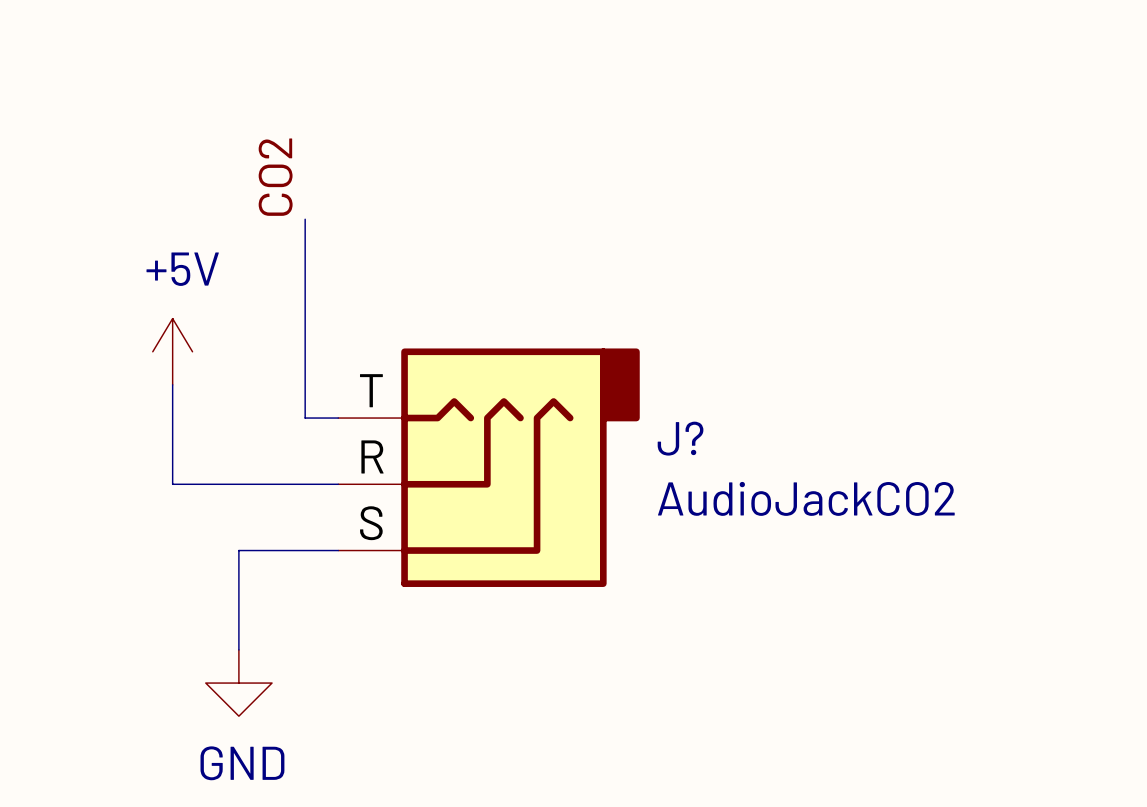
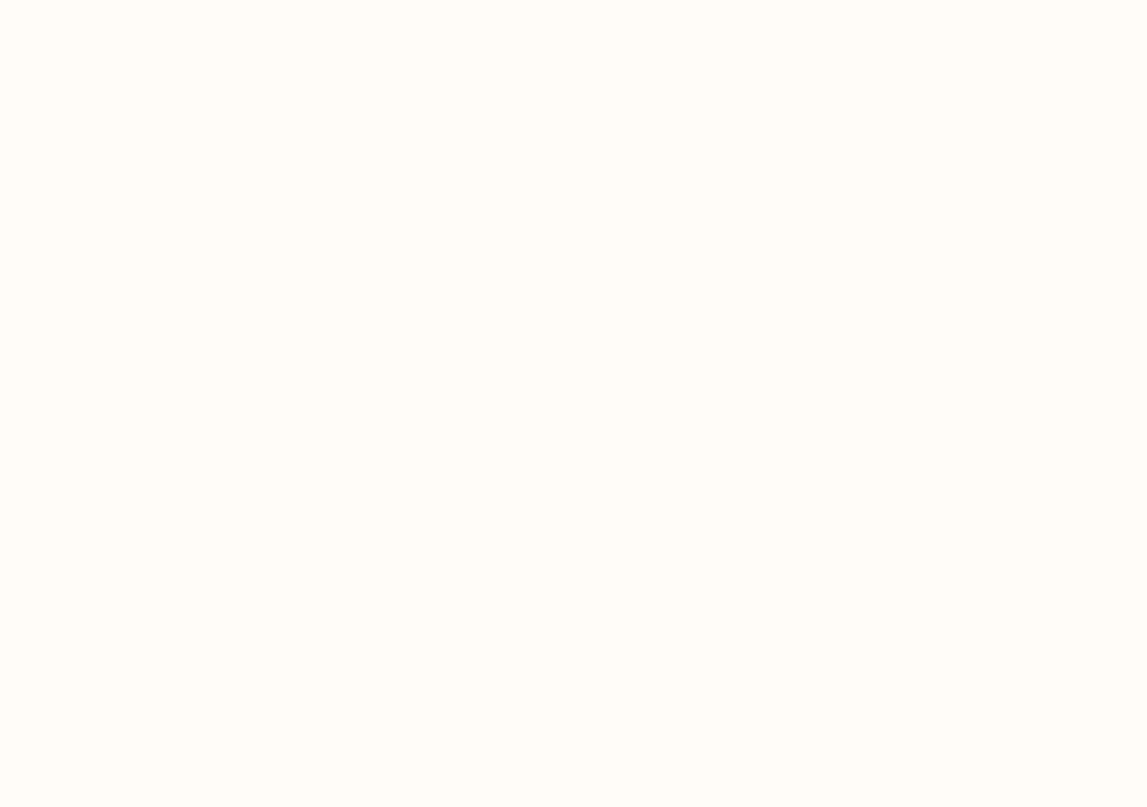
label: CO2 (275, 177) -> none
wire: (305, 219) (305, 418) (338, 418) -> none
power symbol: +5V (172, 351) -> none
wire: (172, 384) (172, 484) (338, 484) -> none
J?: AudioJackCO2 (489, 467) -> none
wire: (338, 550) (238, 550) (238, 649) -> none
power symbol: GND (238, 683) -> none

